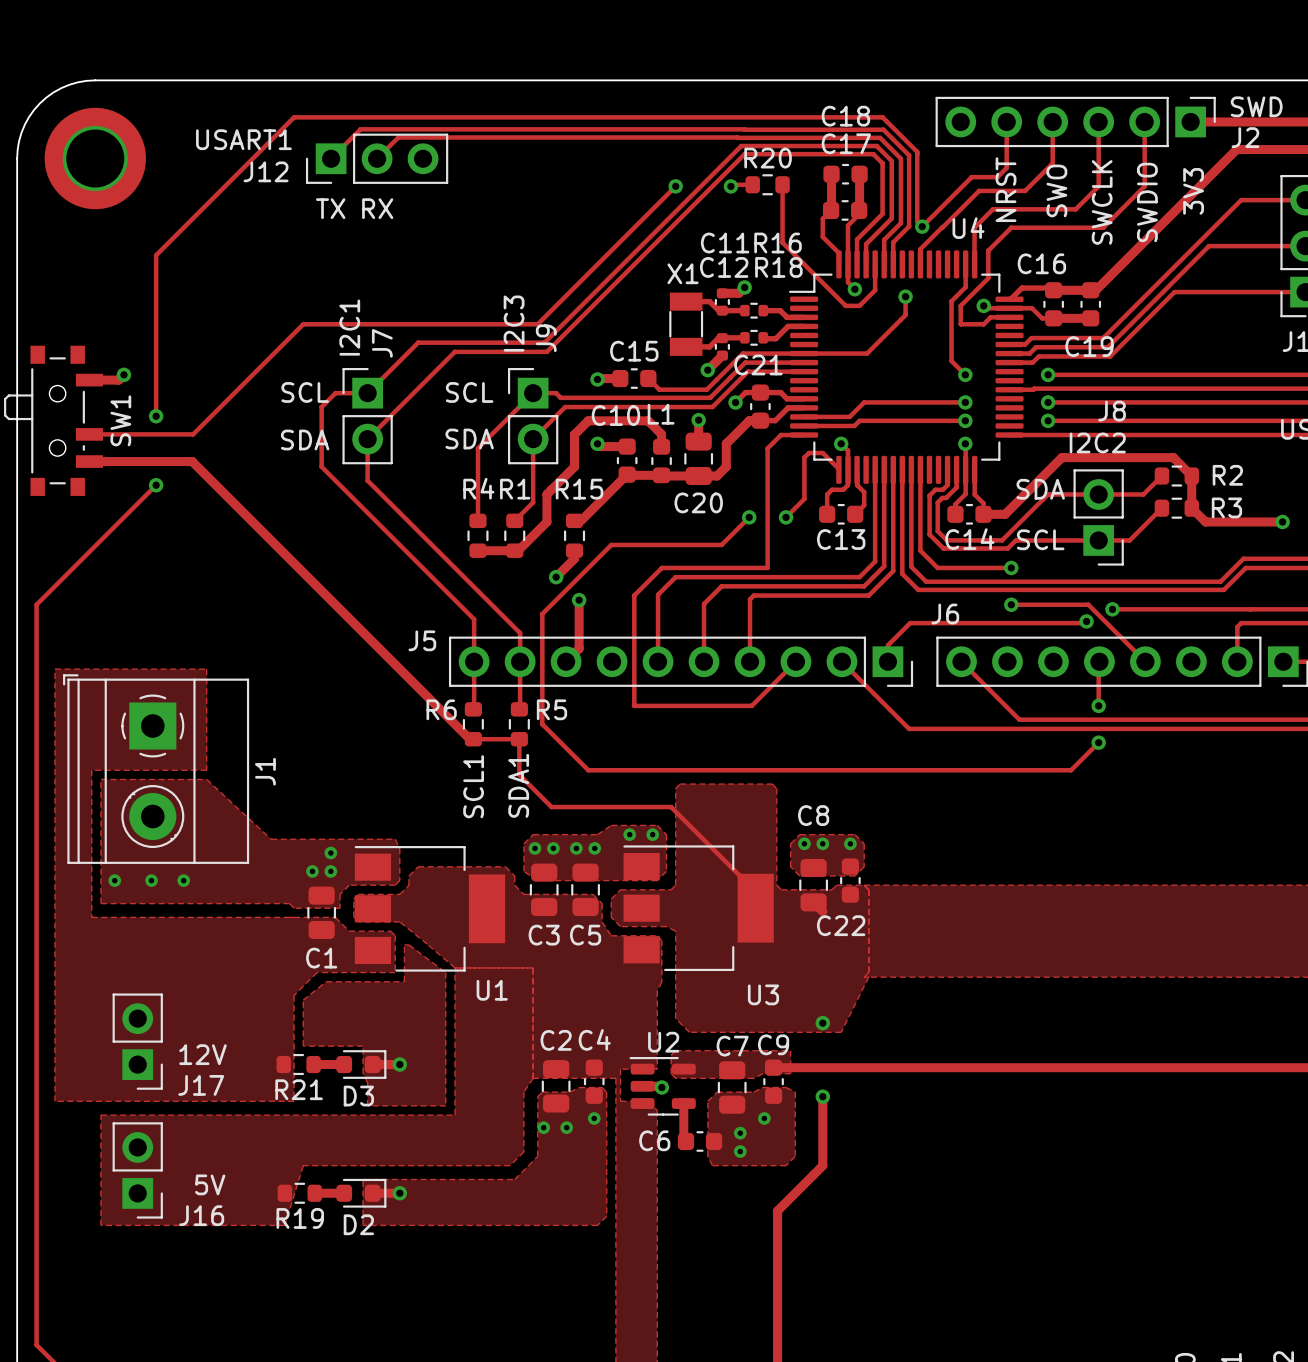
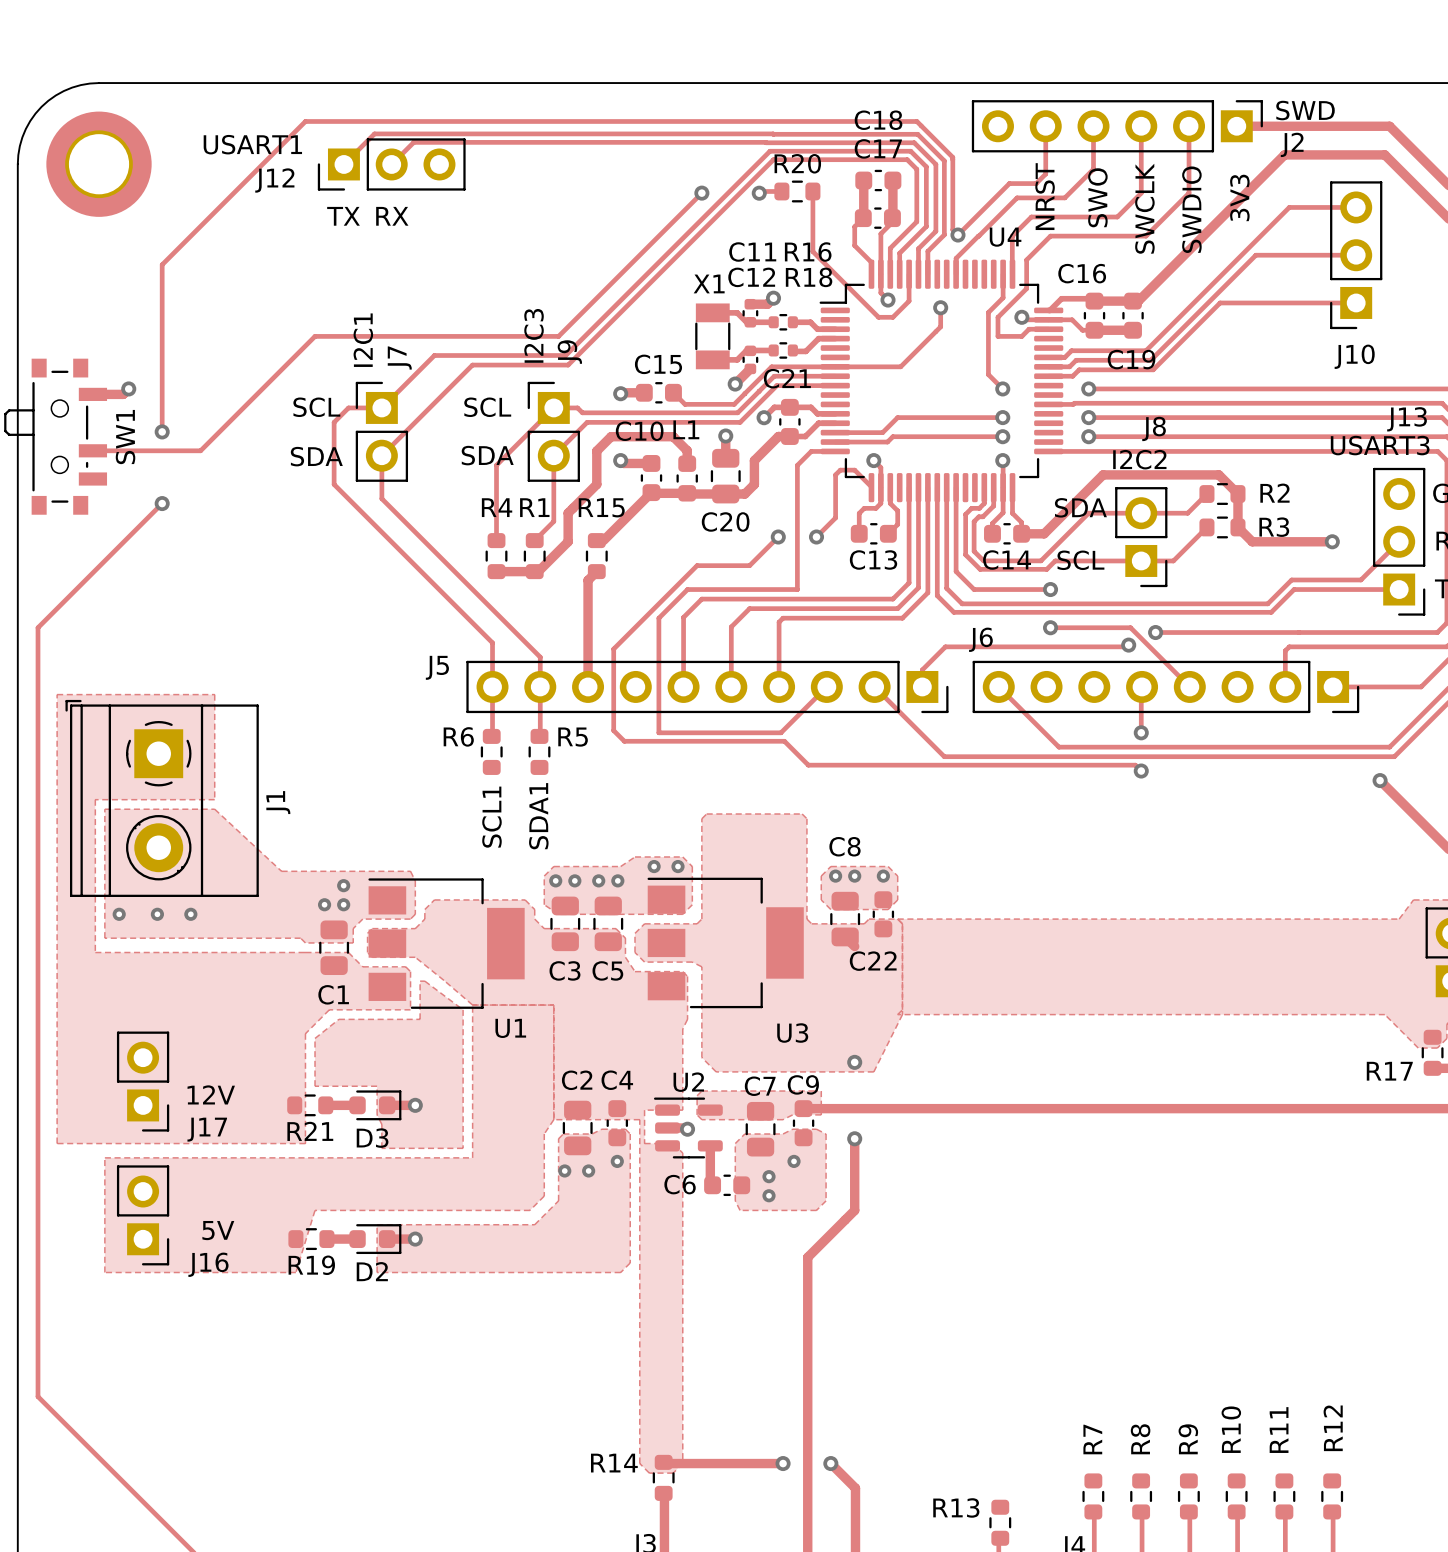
track: (89, 461) (192, 461) (469, 739) -> none
track: (671, 544) (611, 544) (542, 613) (542, 724) (588, 770) (1071, 770) (1098, 742) -> (697, 565) (613, 649) (613, 730) (624, 741) (784, 741) (808, 765) (1135, 765) (1141, 771)
track: (574, 550) (574, 558) (556, 577) -> none
via: (556, 577) -> none
track: (579, 600) (579, 648) (566, 661) -> (596, 571) (588, 580) (588, 686)
via: (579, 600) -> none
track: (473, 739) (519, 739) (519, 774) (551, 807) (671, 807) (755, 891) -> none

